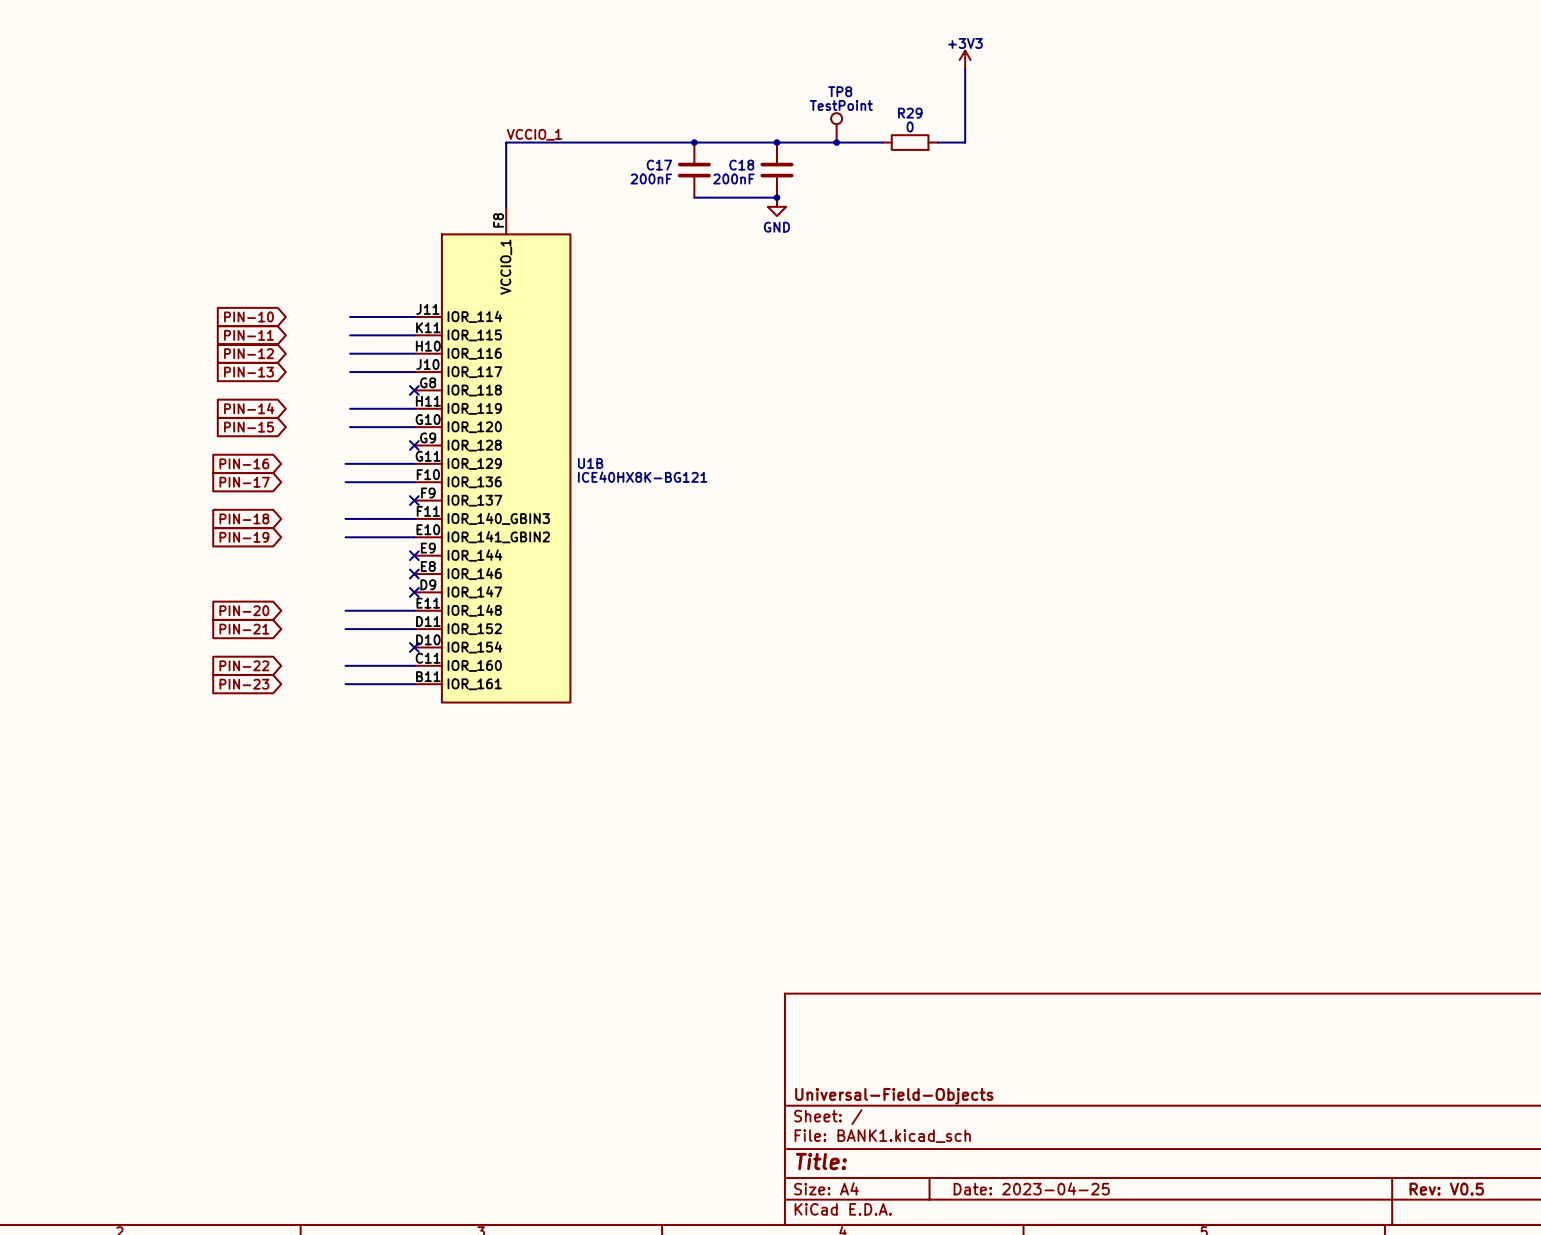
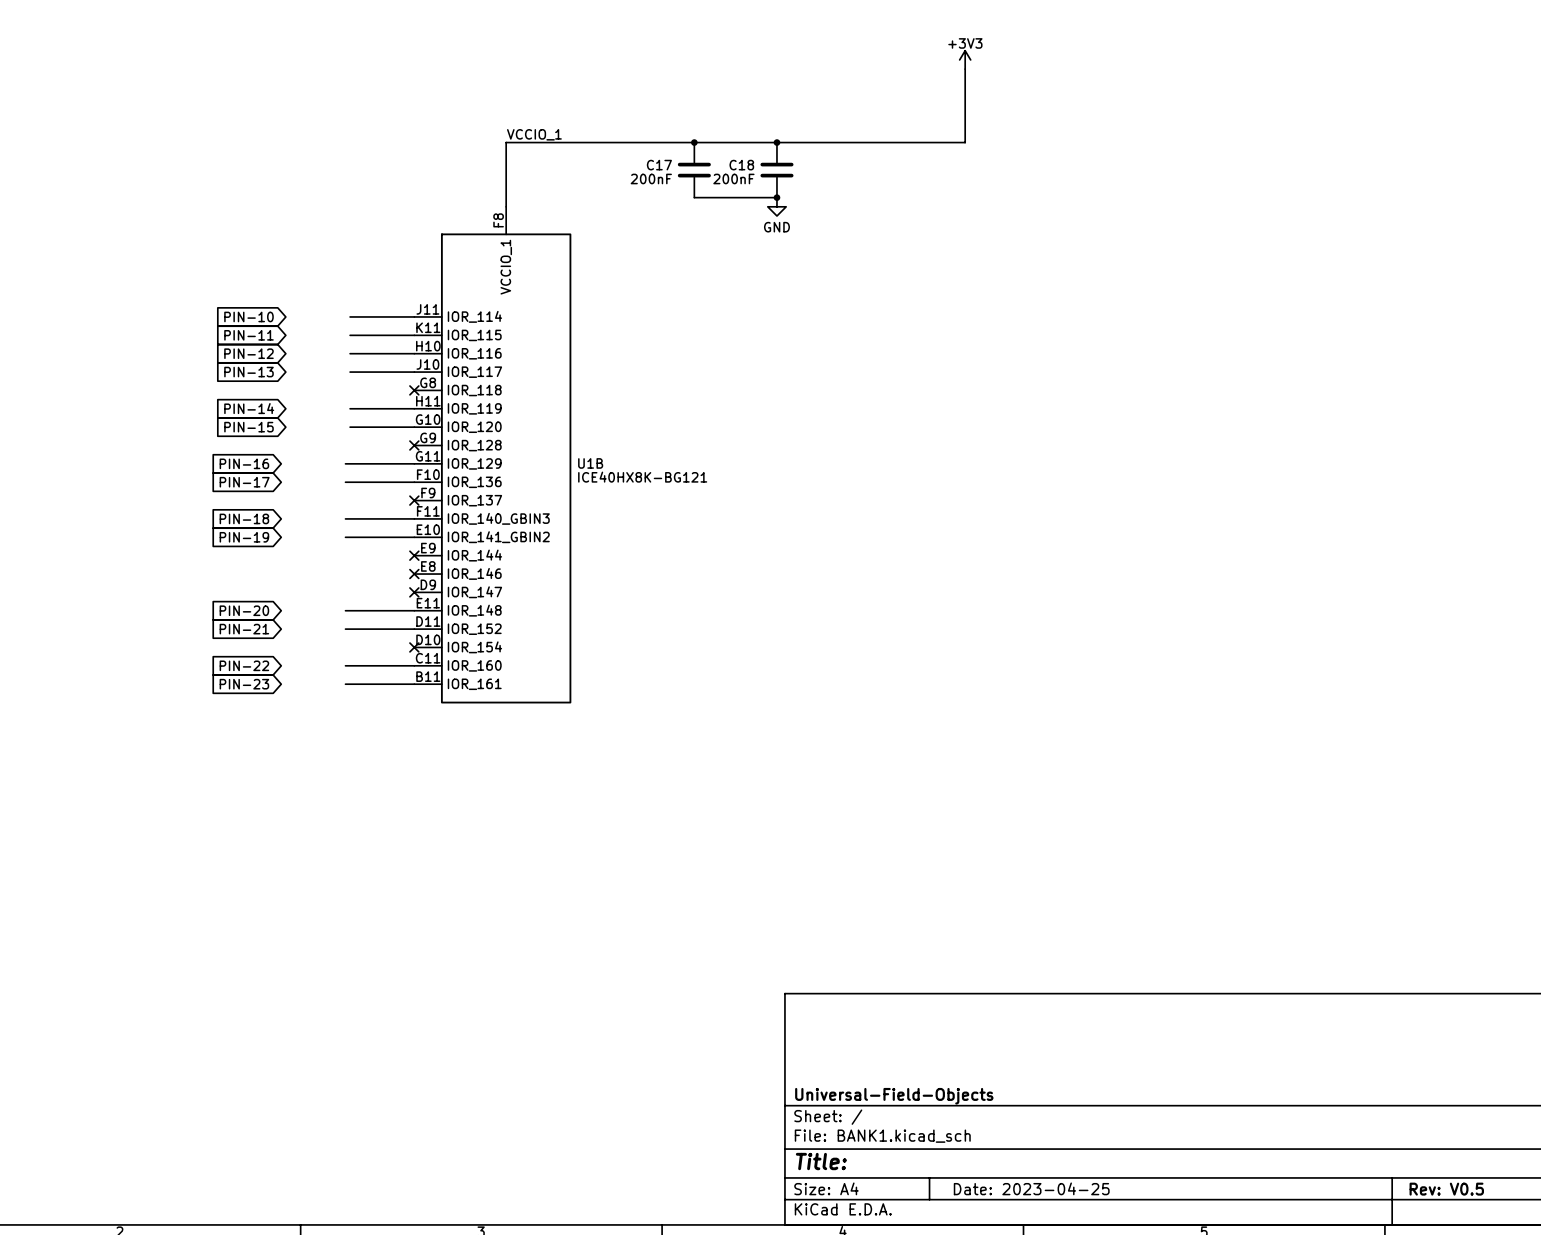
TP8: TestPoint (836, 127) -> none
junction: (836, 142) -> none
wire: none -> (882, 142) (937, 142)
R29: 0 (910, 142) -> none

